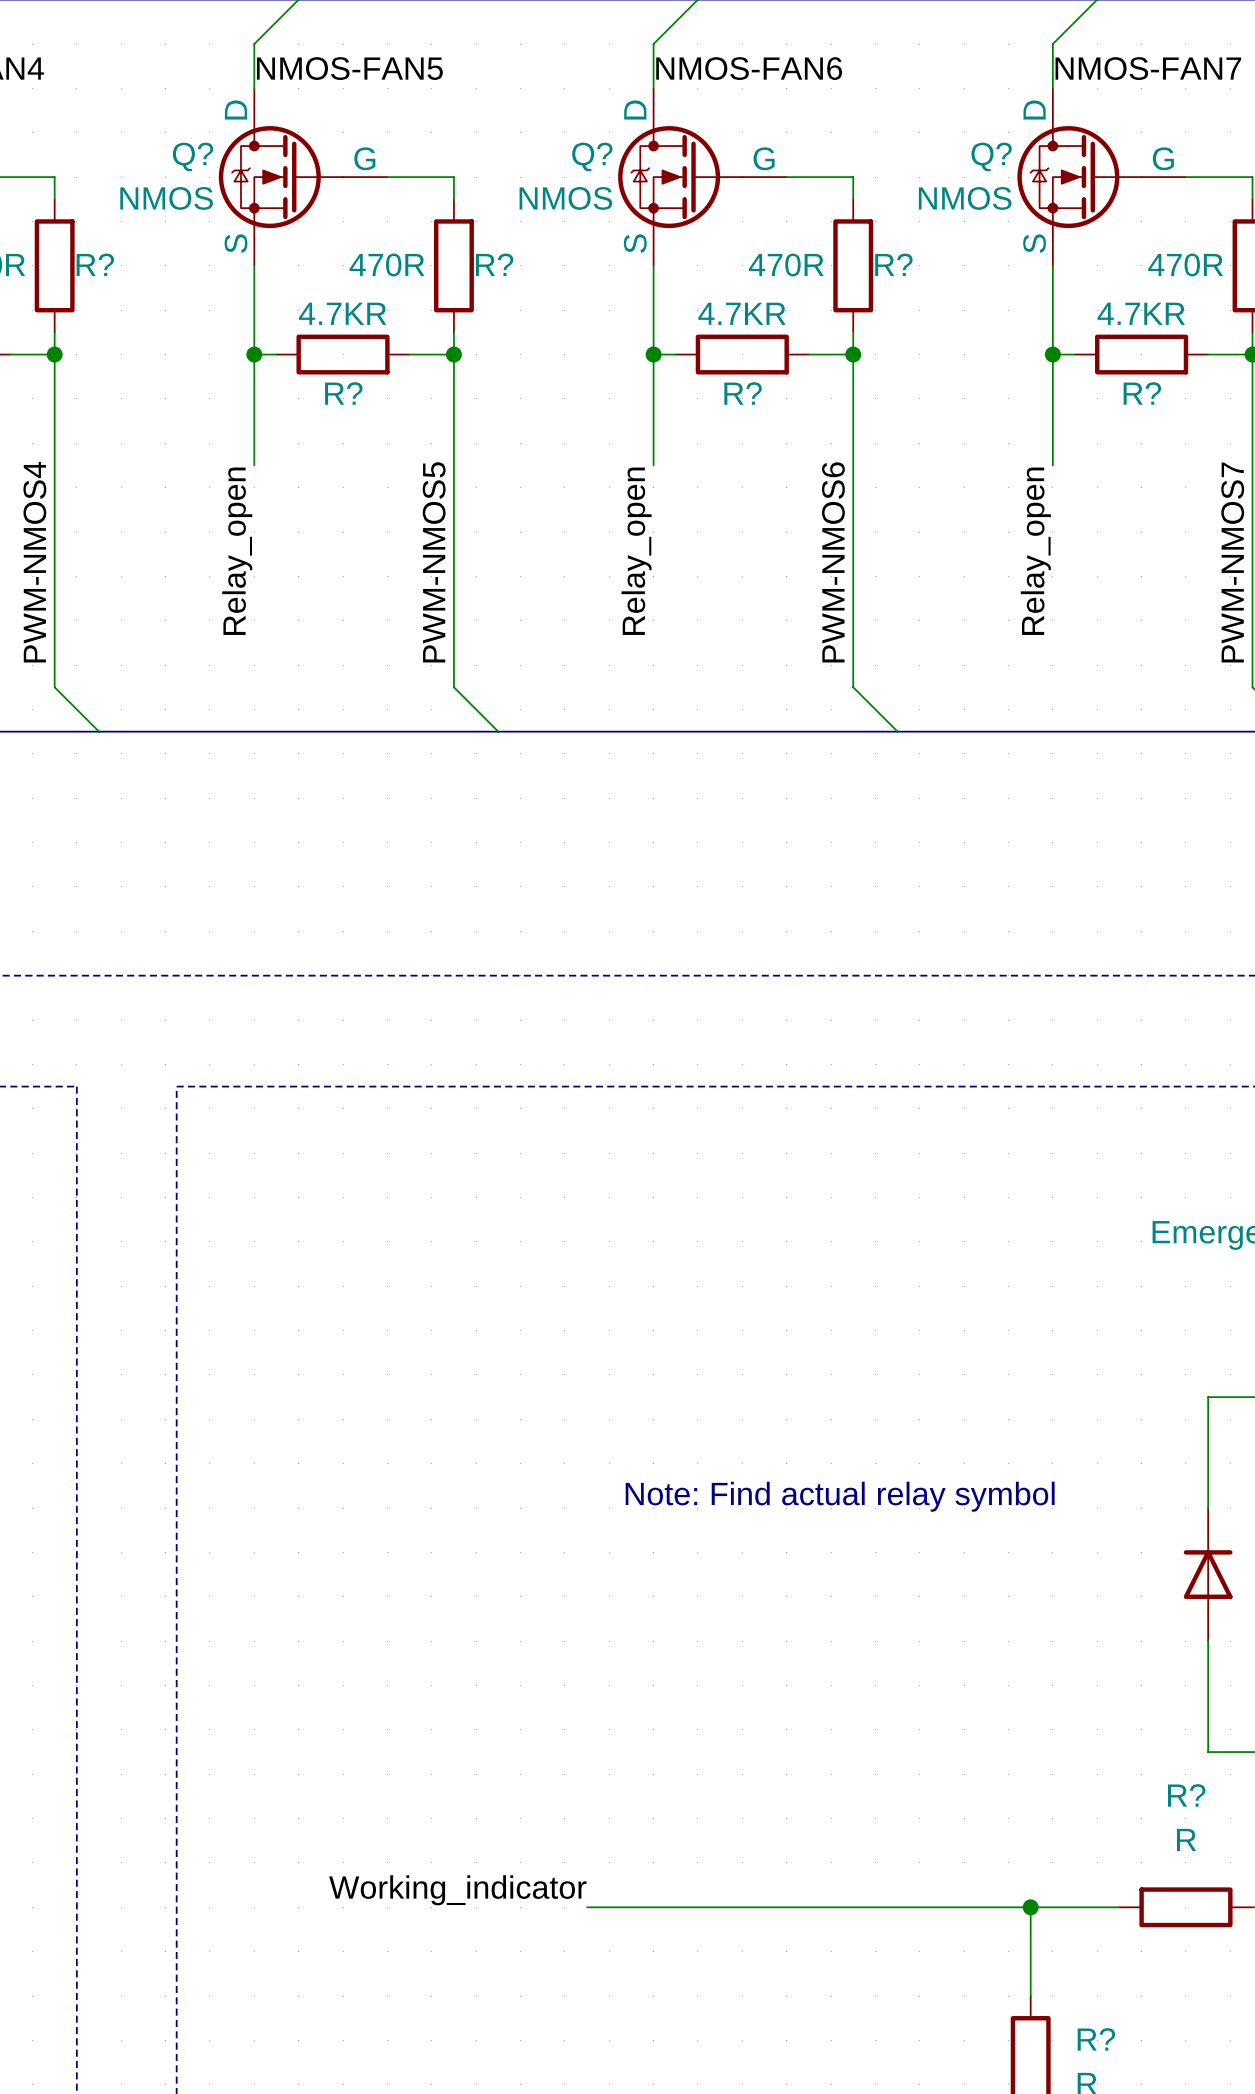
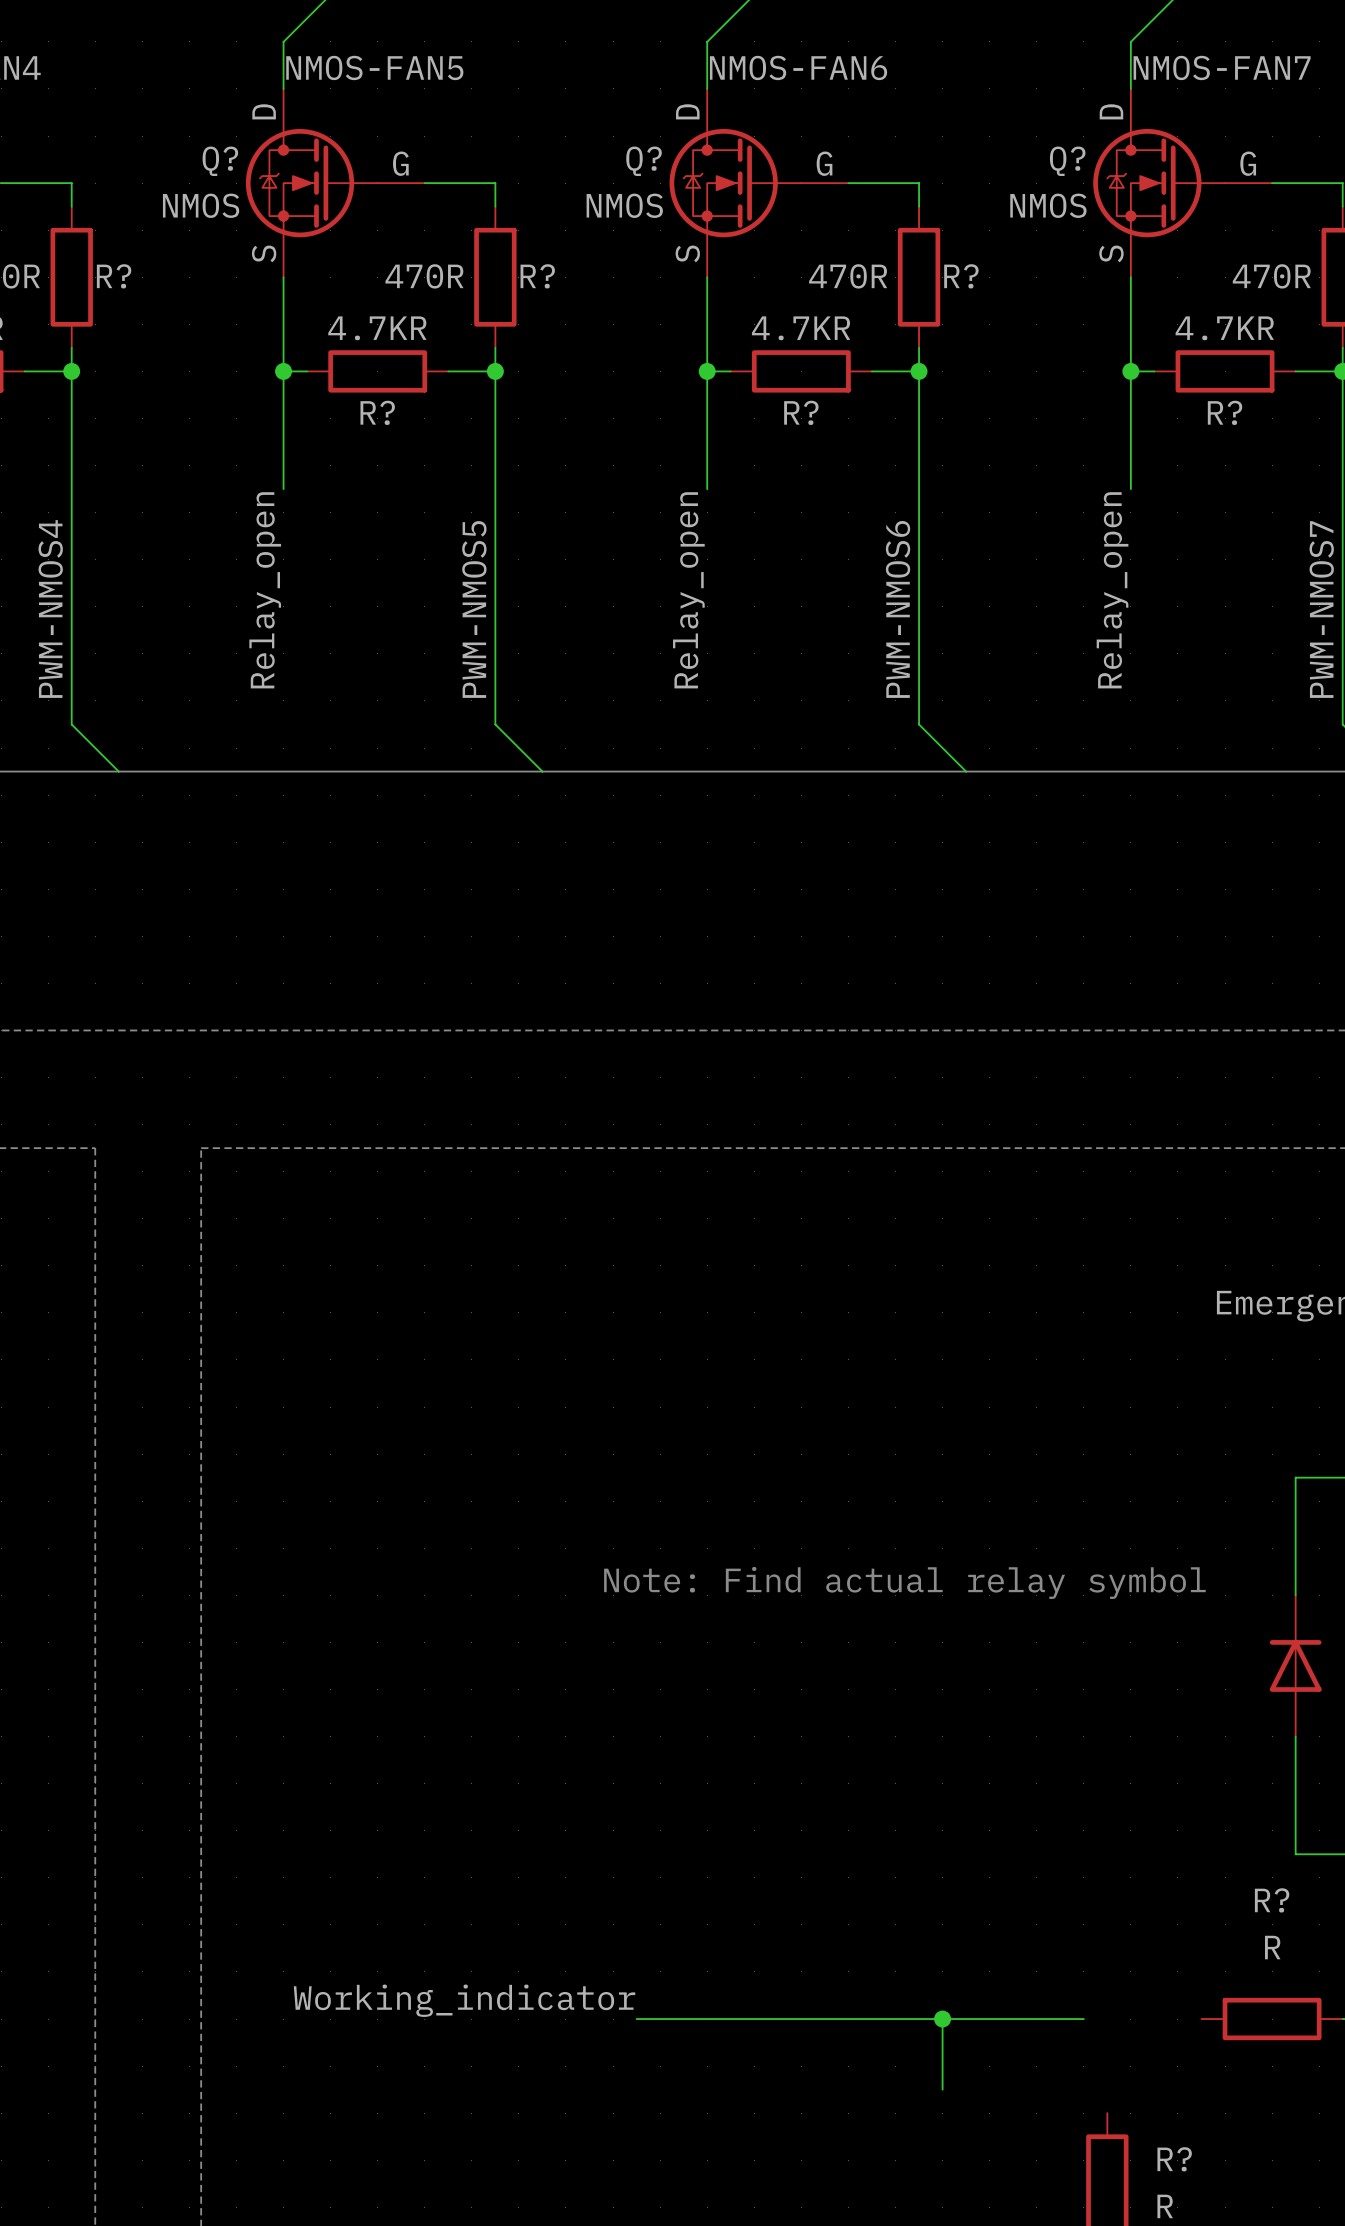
wire: none -> (942, 2019) (942, 2089)
junction: none -> (942, 2019)
wire: (1008, 1907) (1119, 1907) -> none
wire: (1030, 1907) (1030, 1996) -> none
junction: (1030, 1907) -> none

